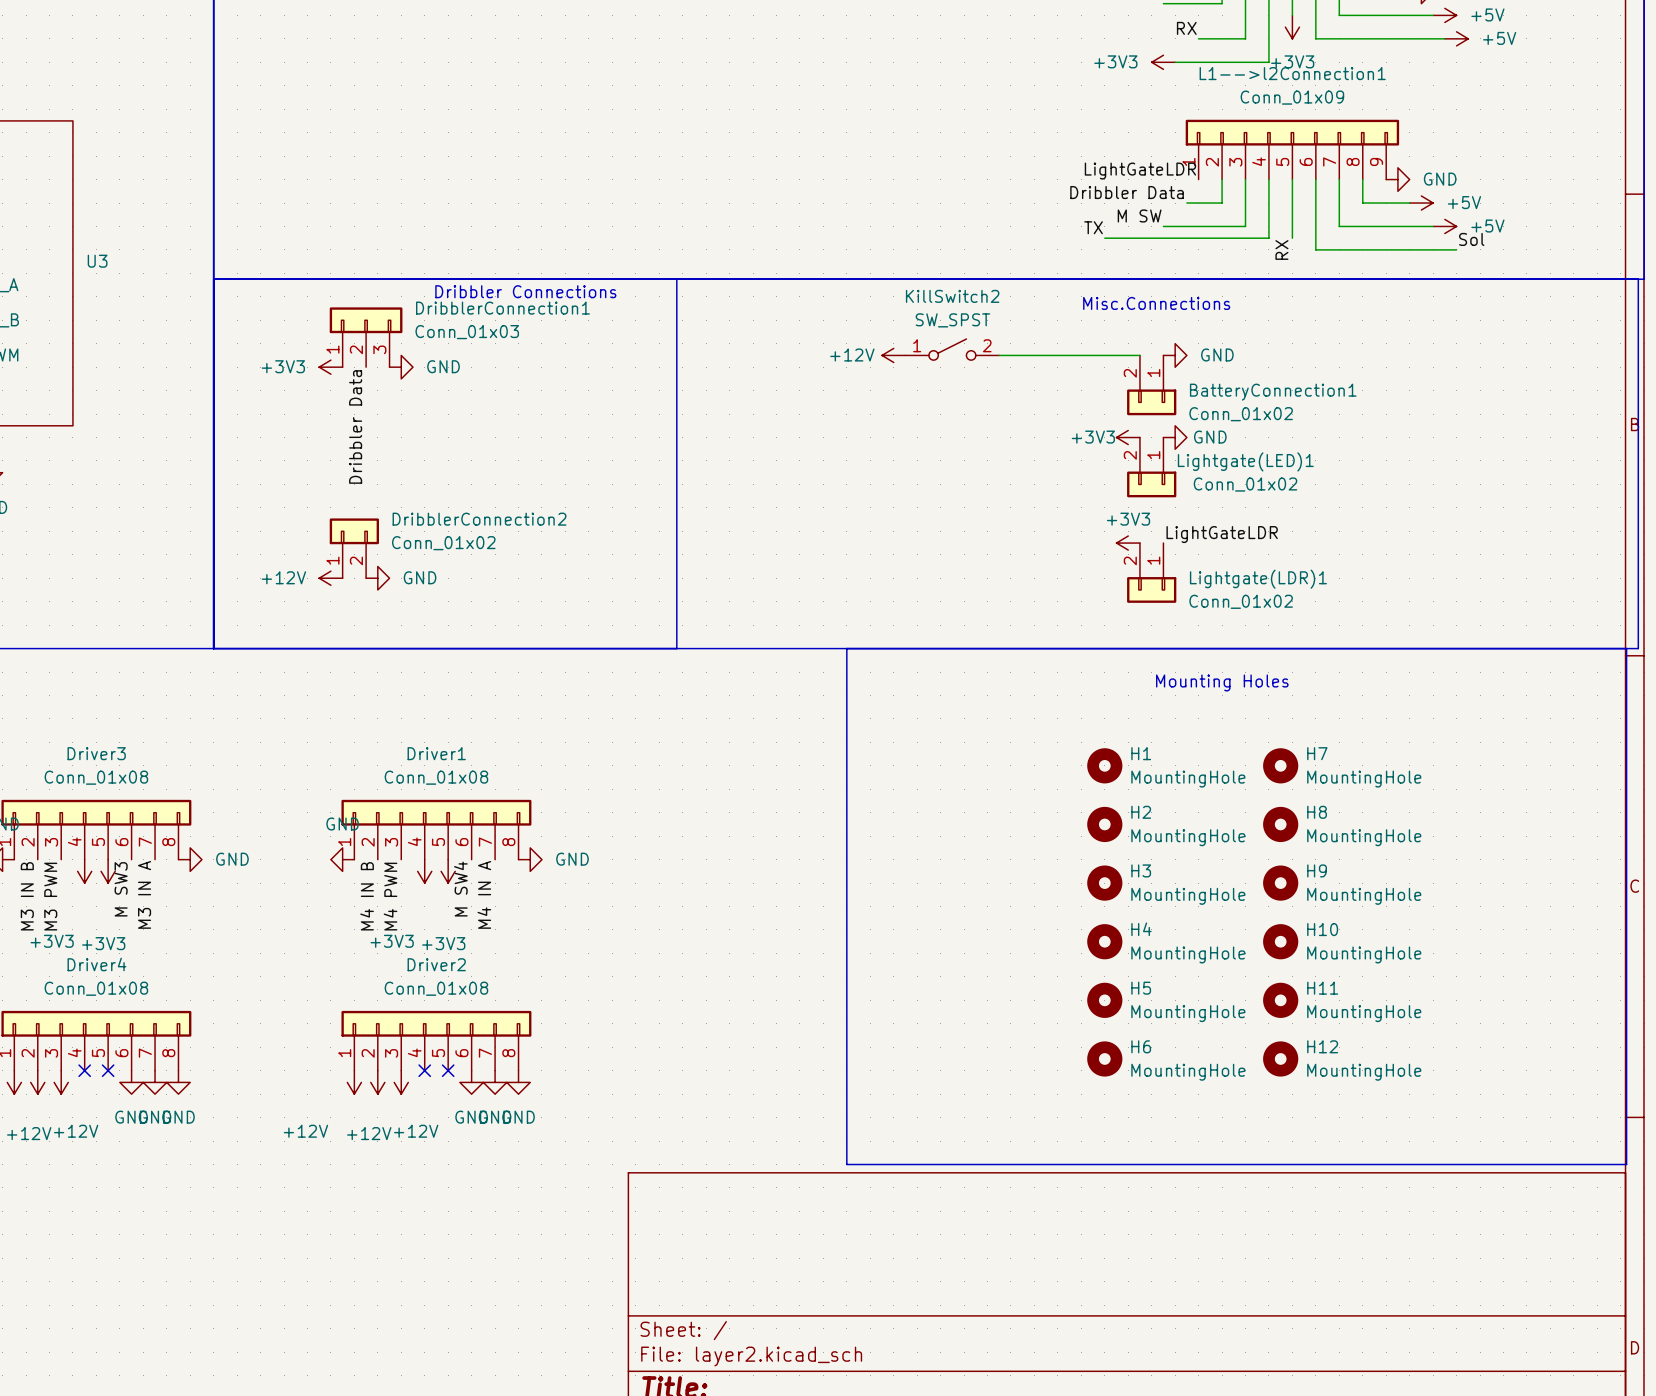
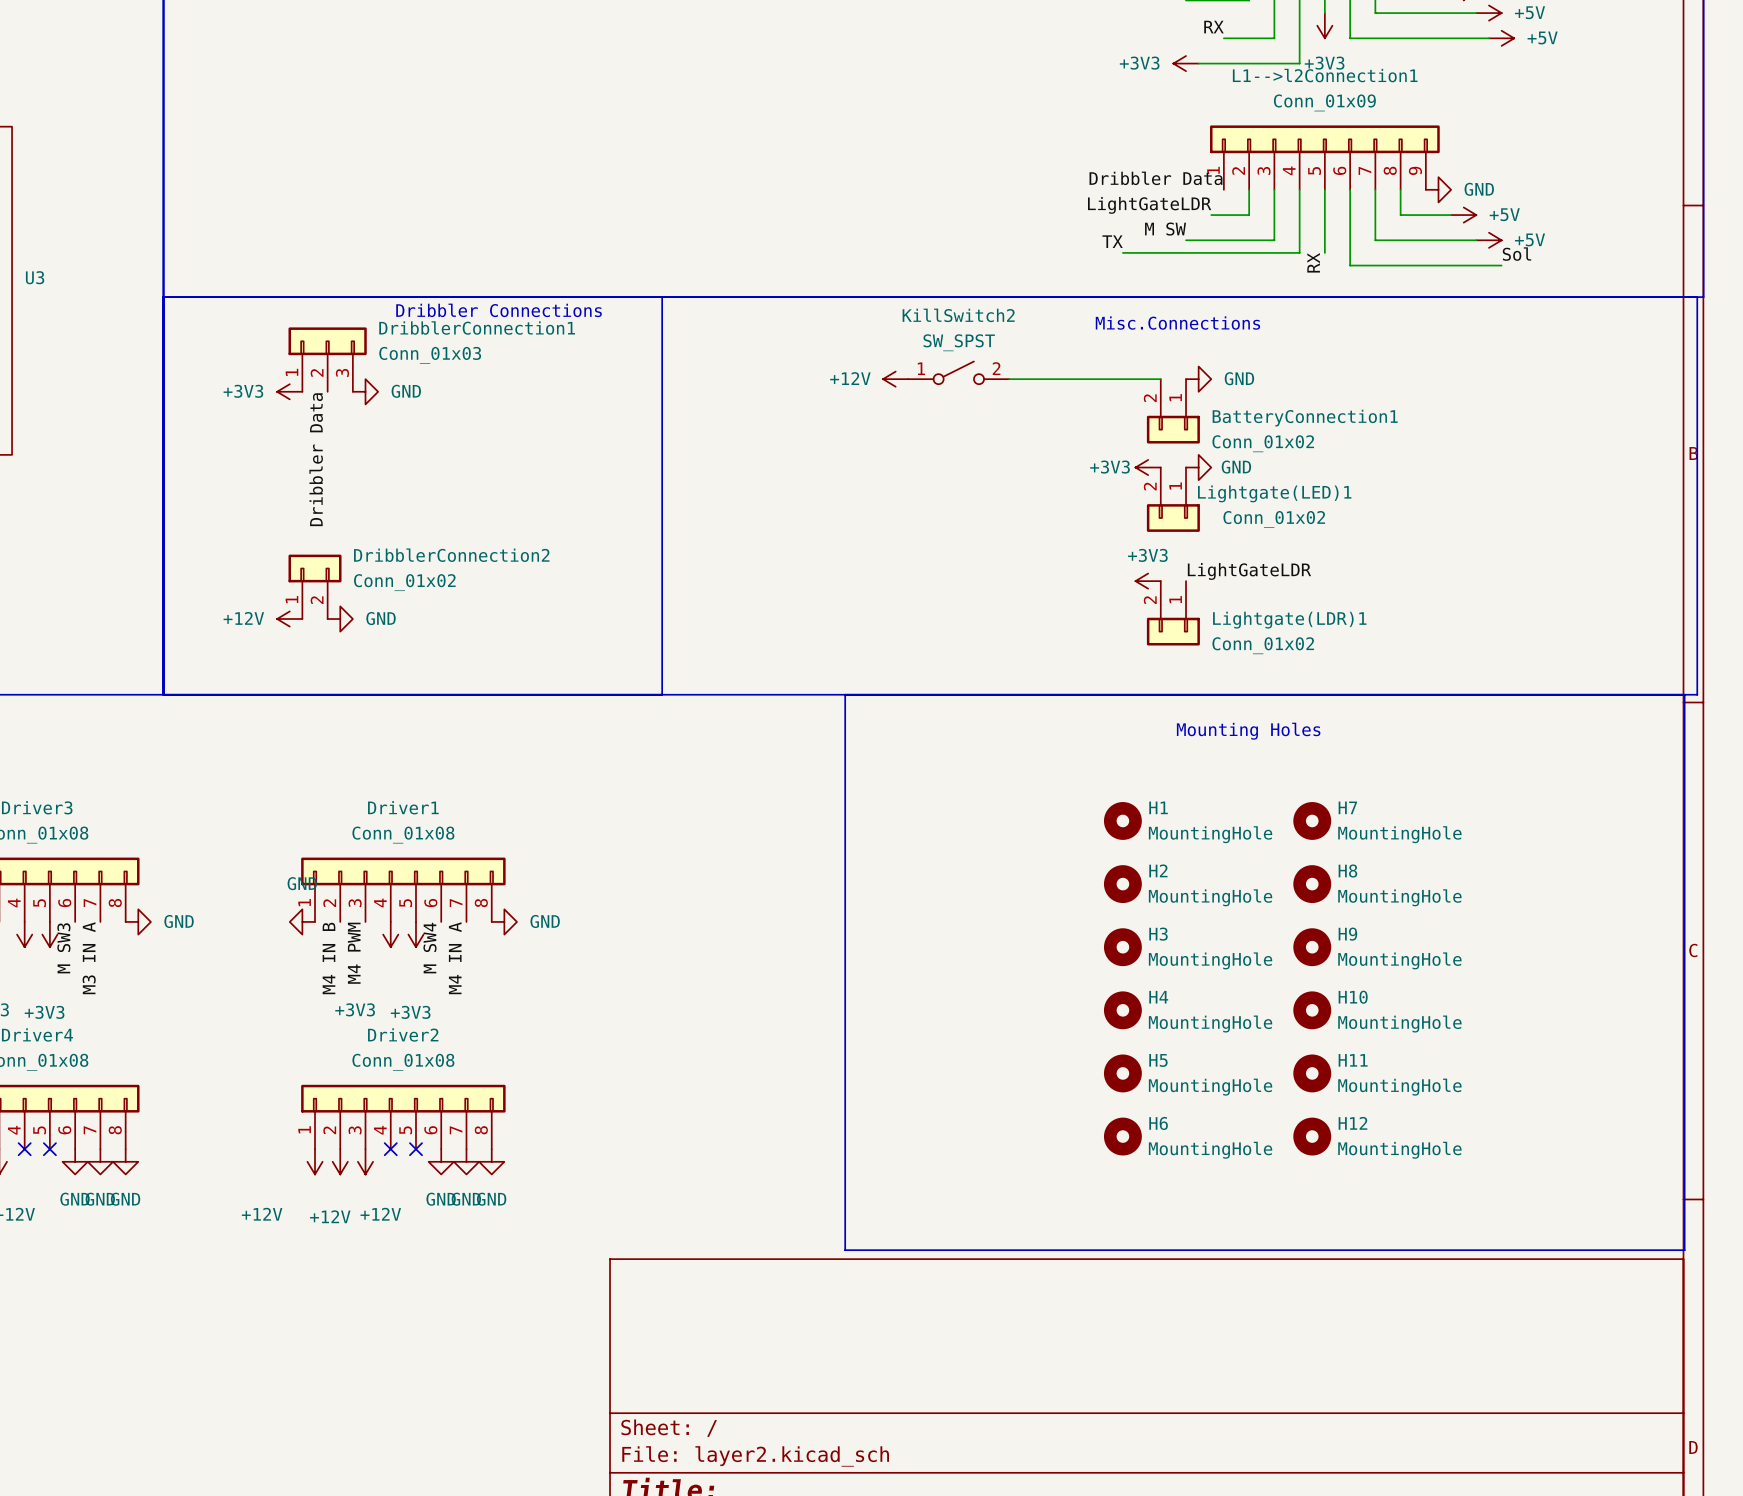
label: LightGateLDR (1140, 171) -> Dribbler Data (1155, 178)
label: Dribbler Data (1127, 192) -> LightGateLDR (1149, 205)

